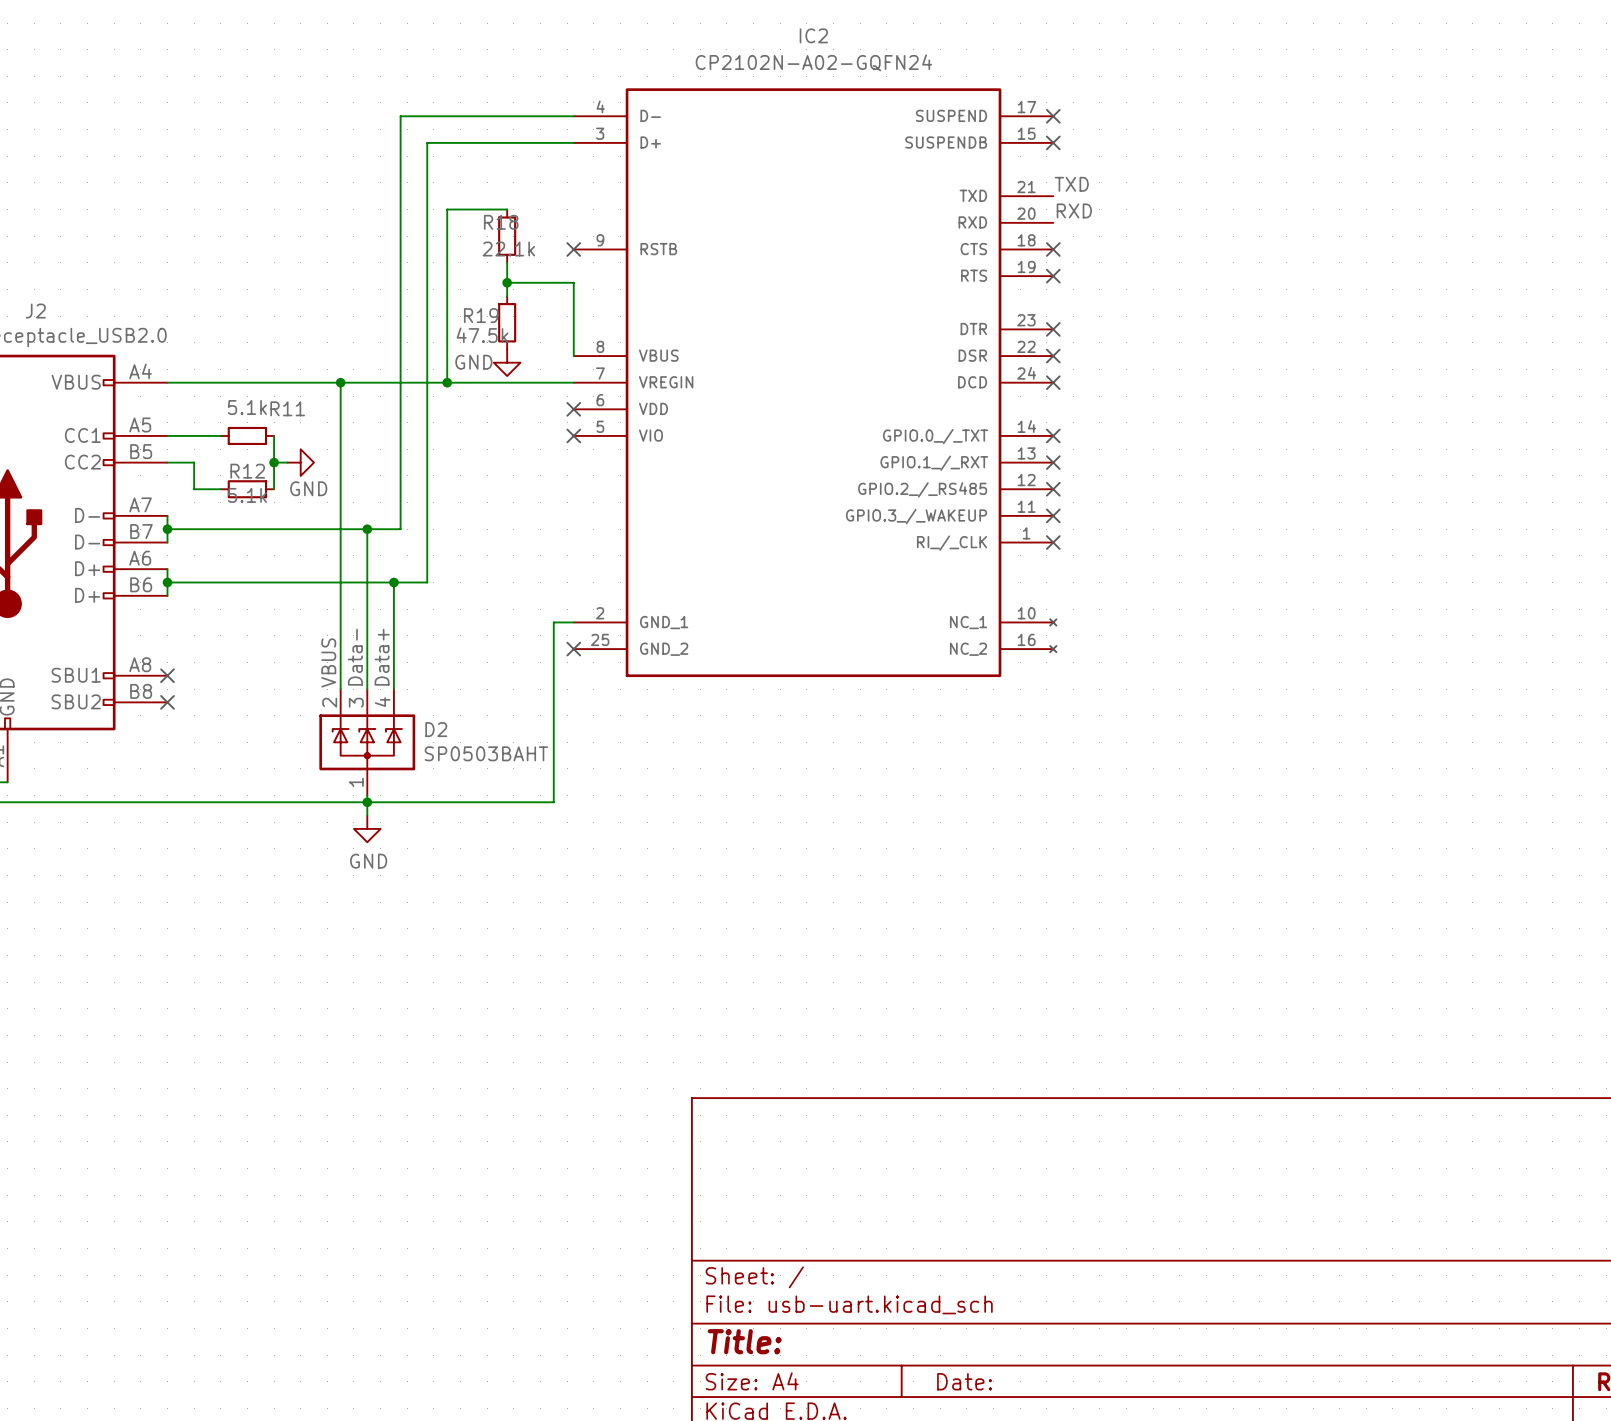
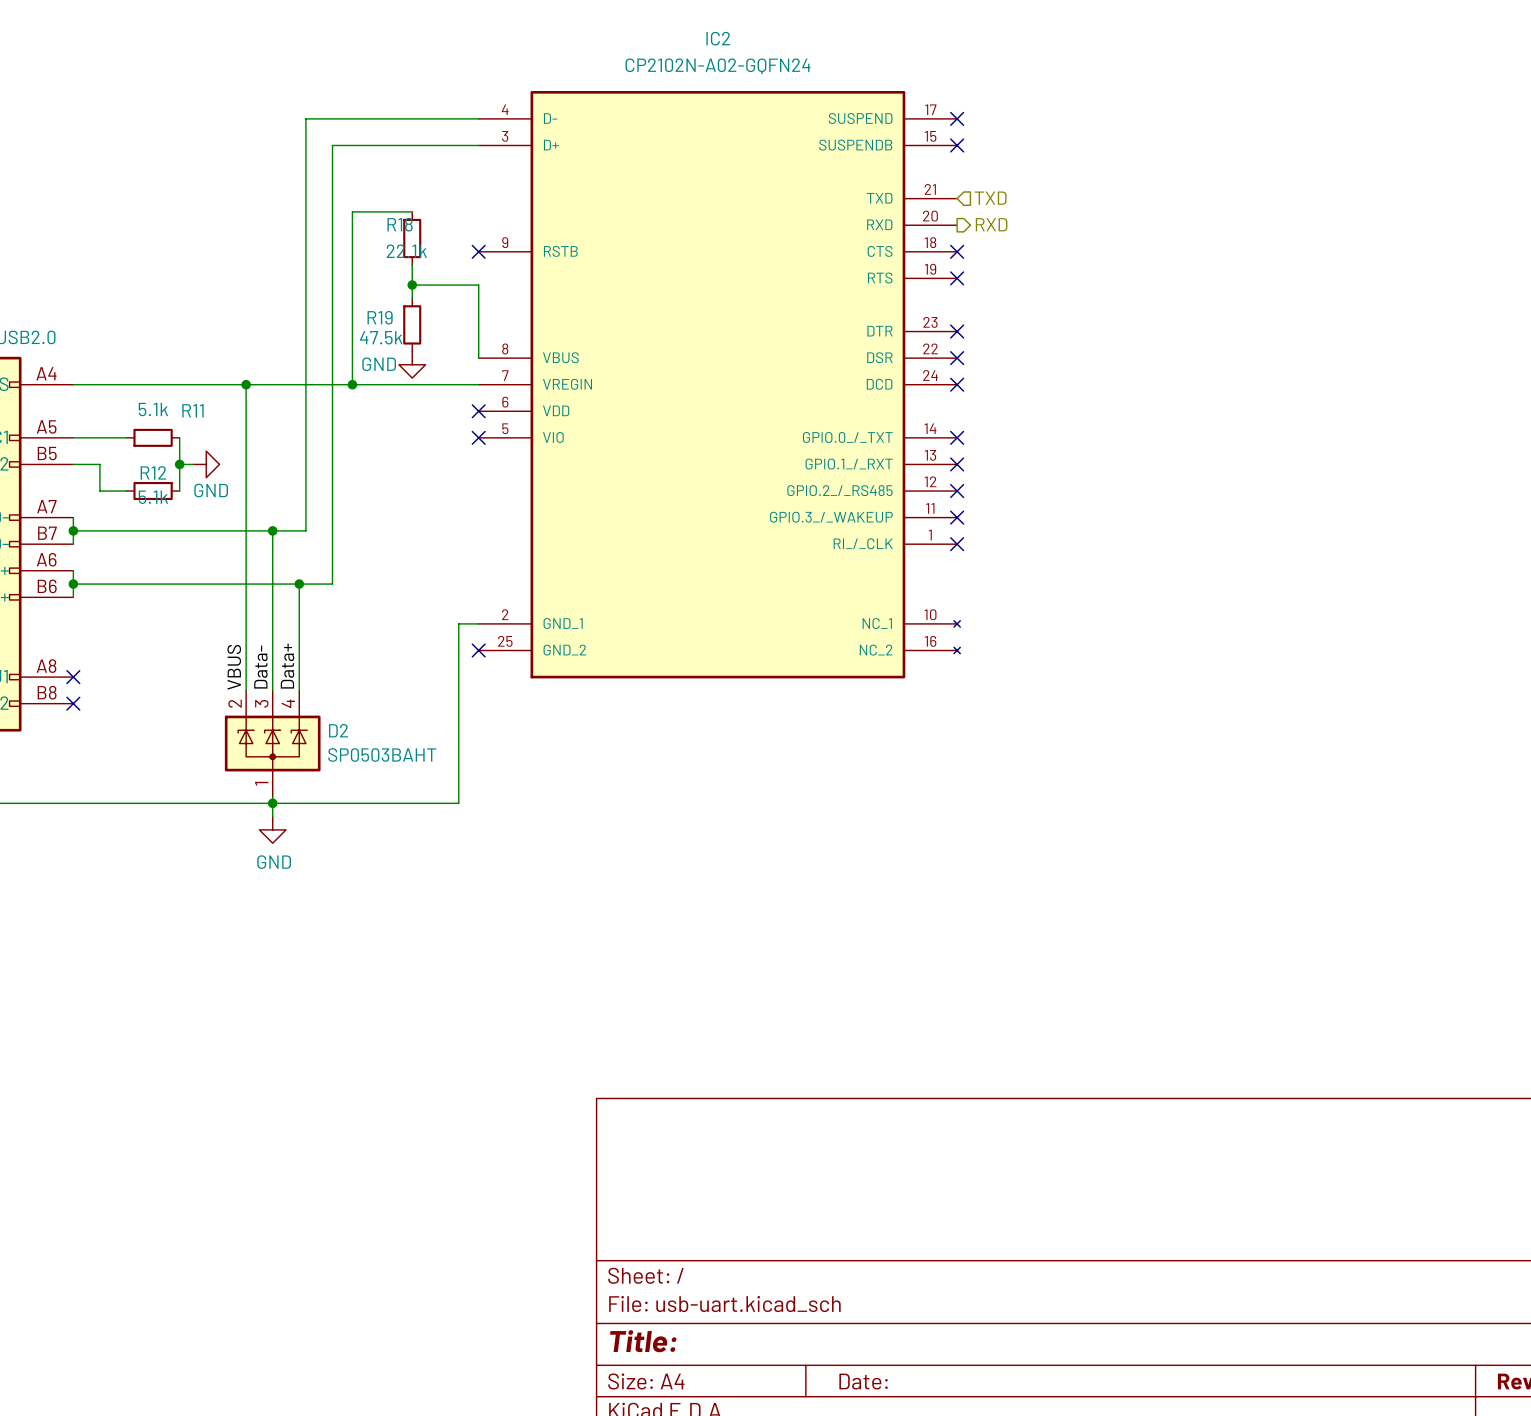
label: TXD (1071, 184) -> none
hierarchical label: none -> TXD (990, 198)
label: RXD (1074, 210) -> none
hierarchical label: none -> RXD (991, 224)

